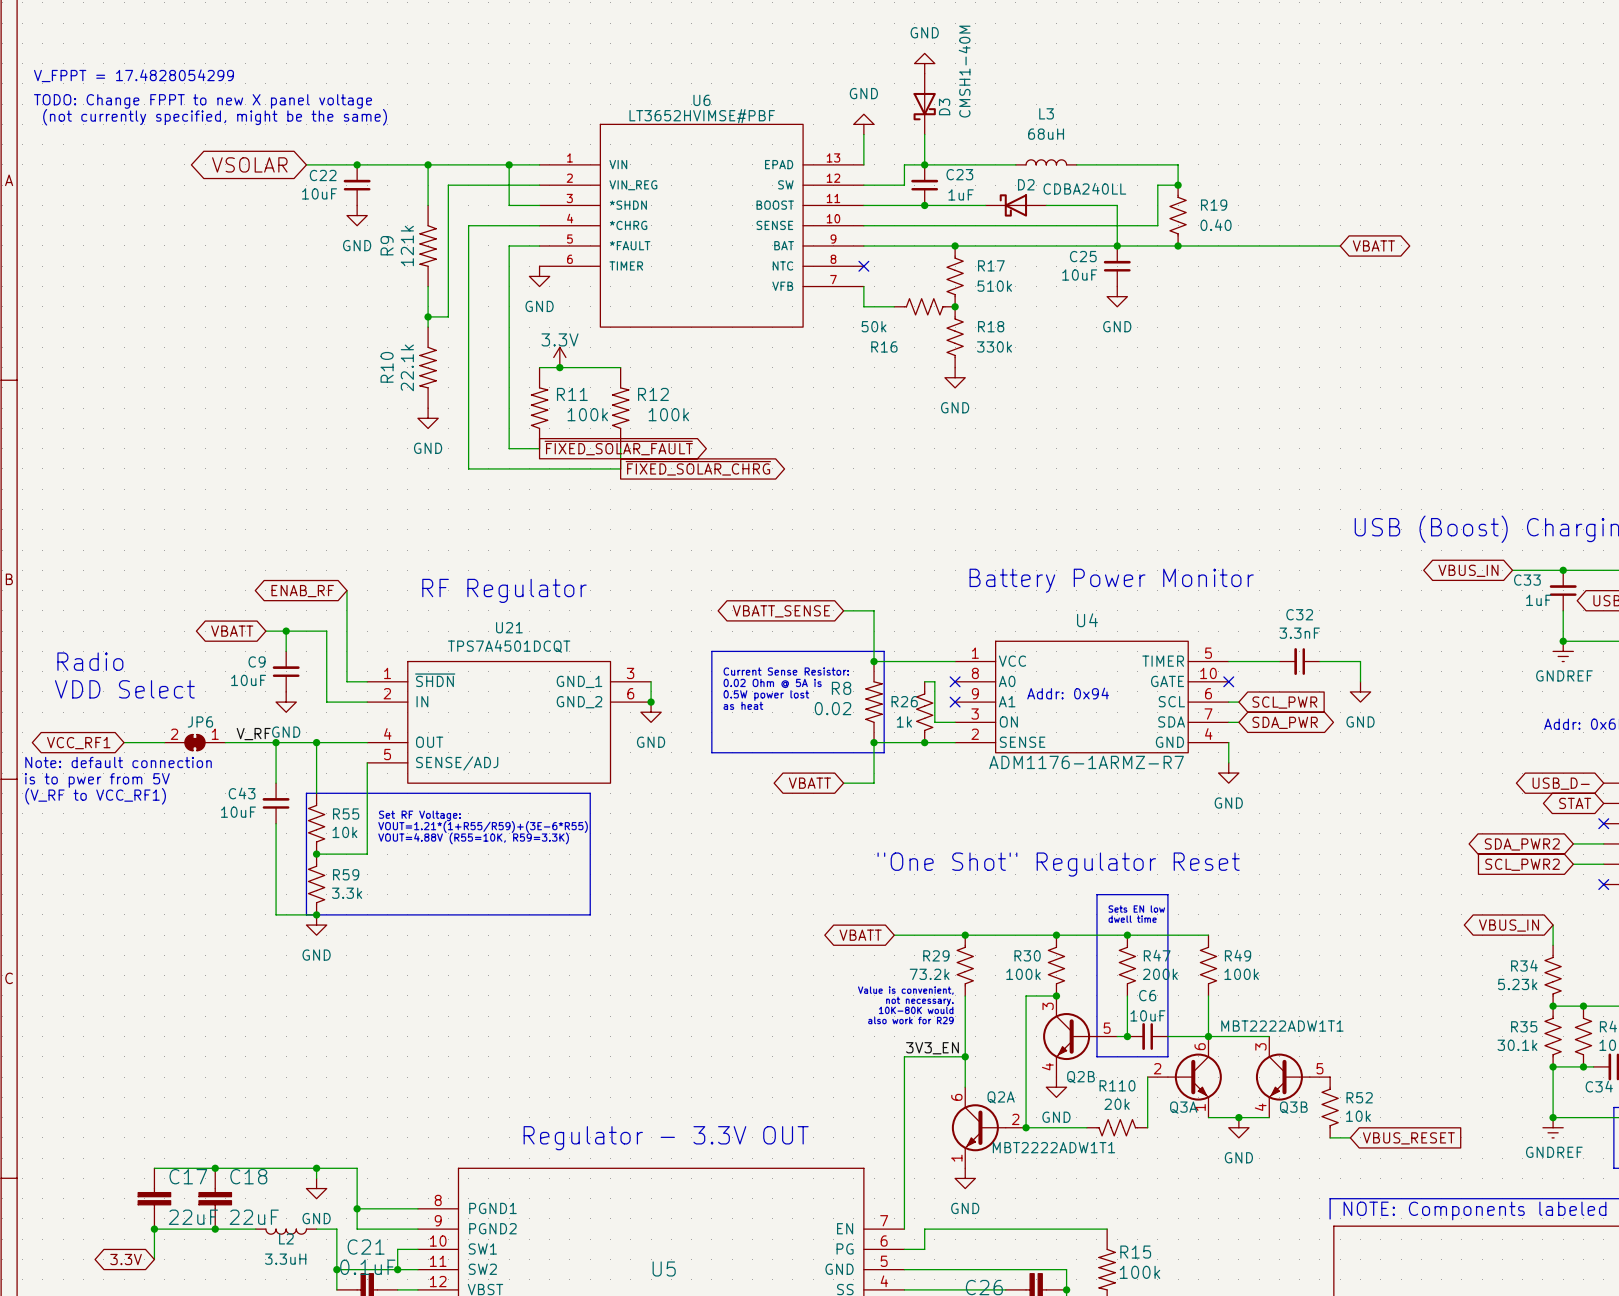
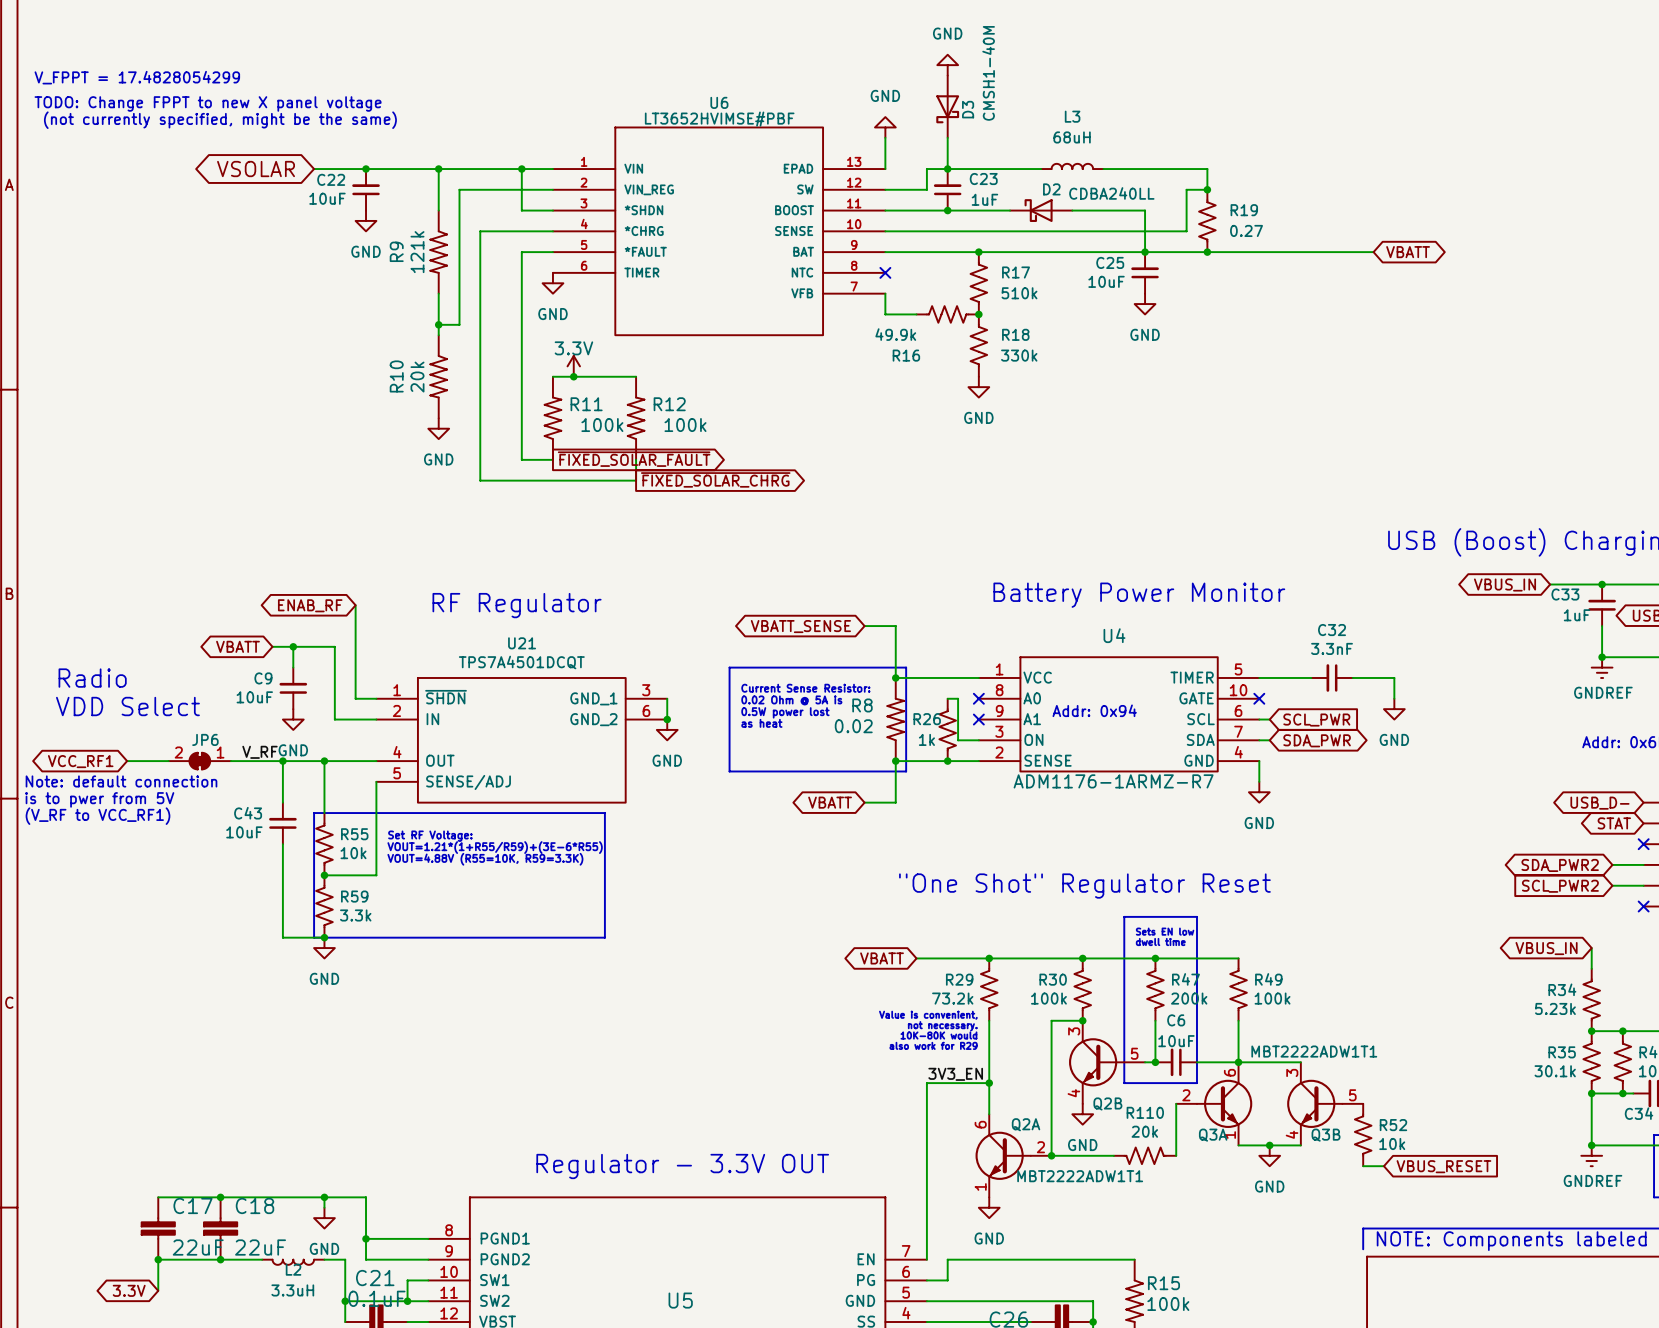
R19 value: 0.40 (1216, 225) -> 0.27 (1246, 230)
R16 value: 50k (874, 326) -> 49.9k (895, 334)
R10 value: 22.1k (407, 367) -> 20k (417, 377)

